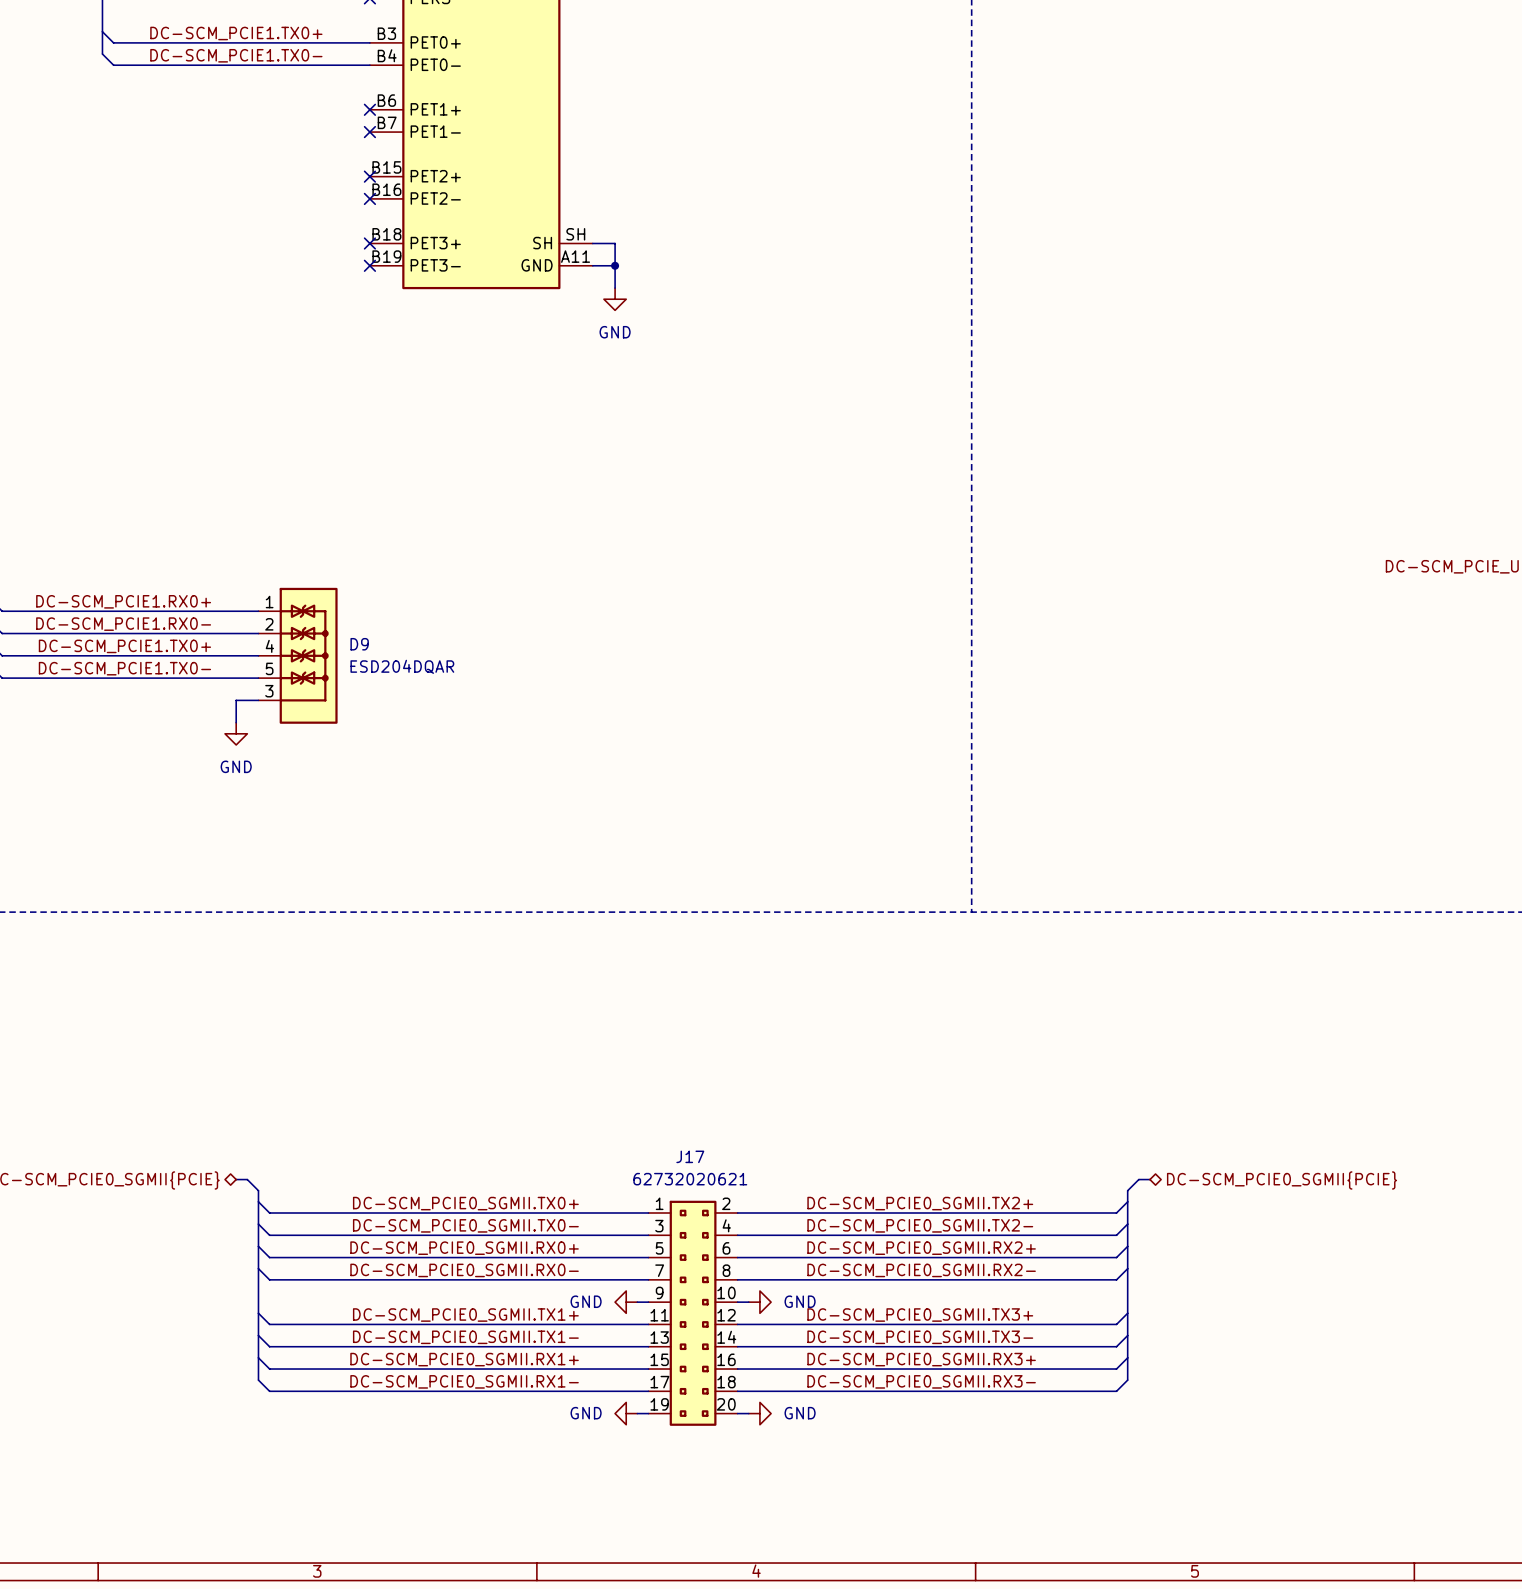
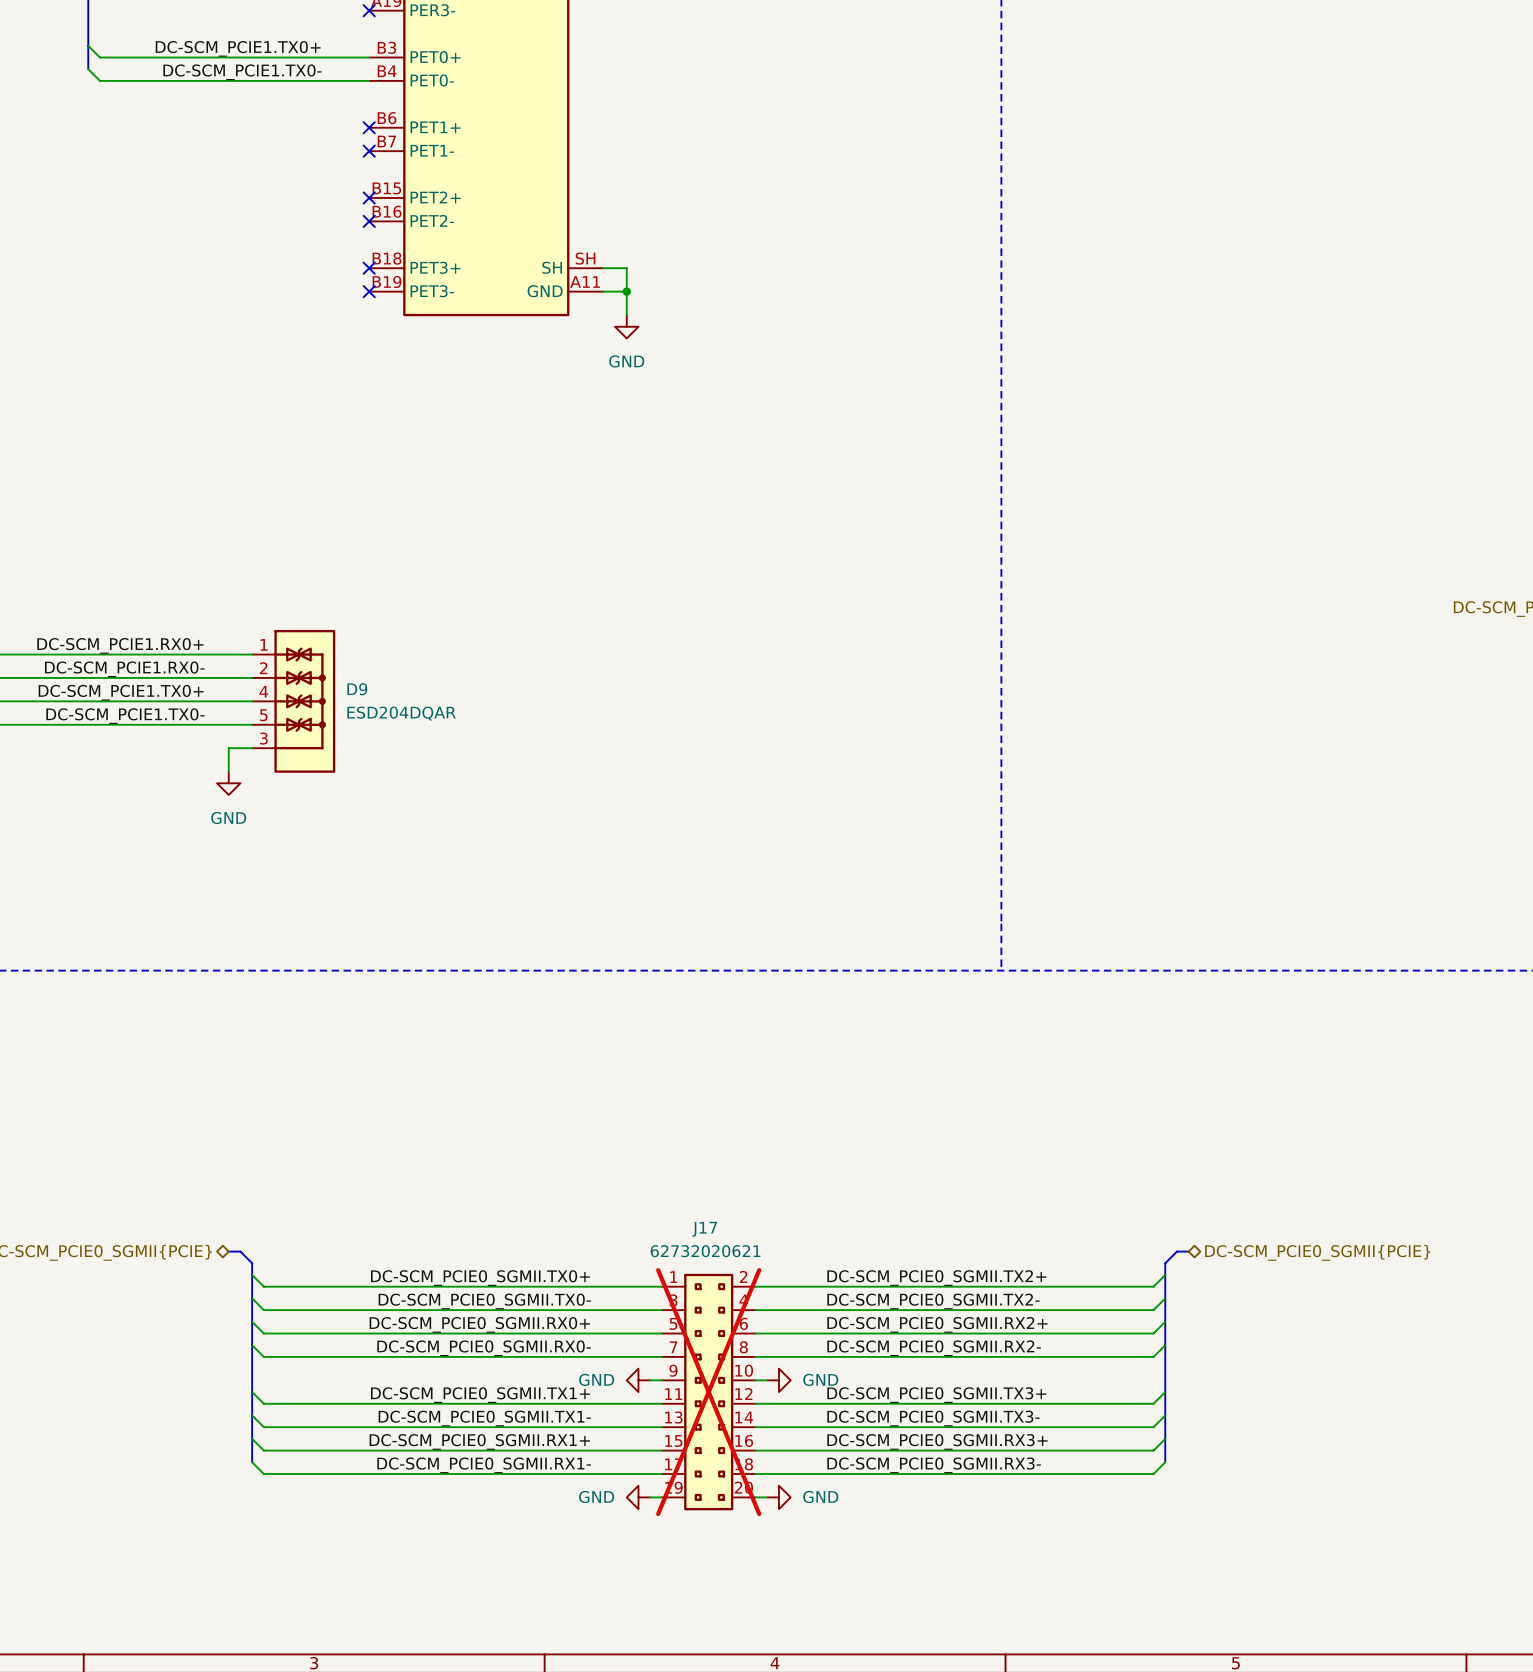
J17 do-not-place cross: none -> (708, 1392)

